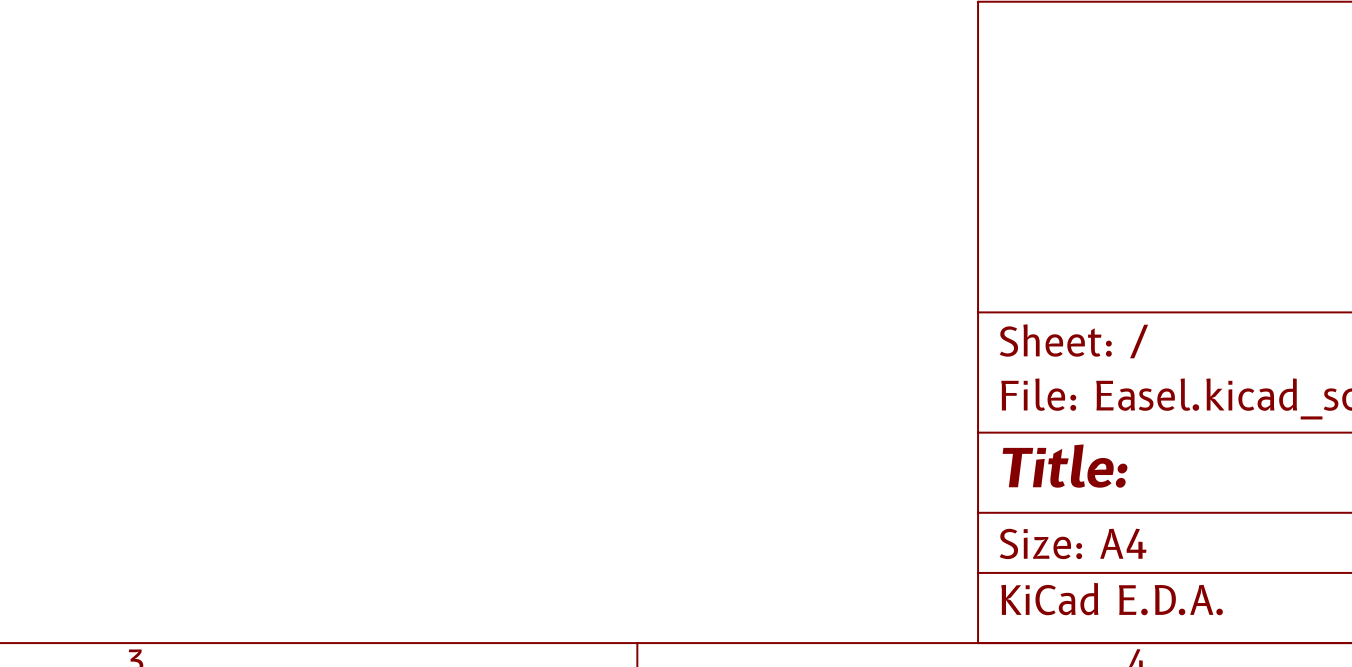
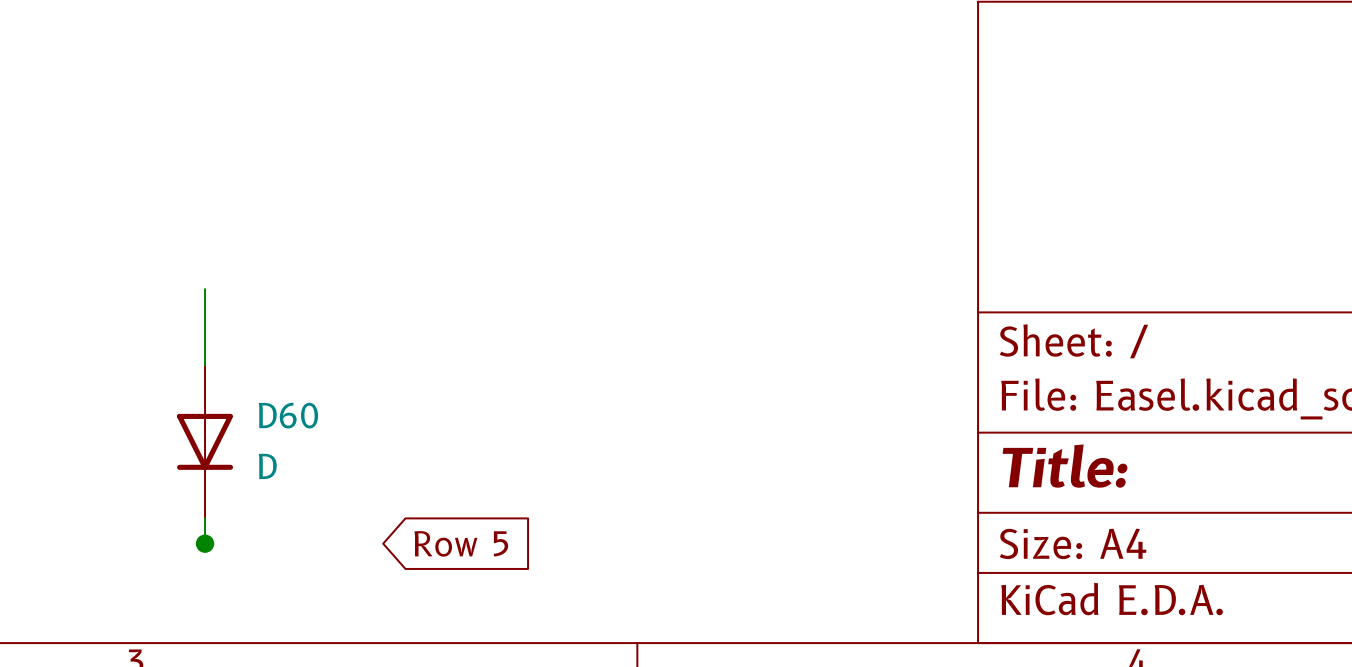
wire: none -> (205, 289) (205, 365)
D60: none -> D (205, 441)
wire: none -> (205, 518) (205, 543)
junction: none -> (205, 543)
global label: none -> Row 5 (461, 543)

